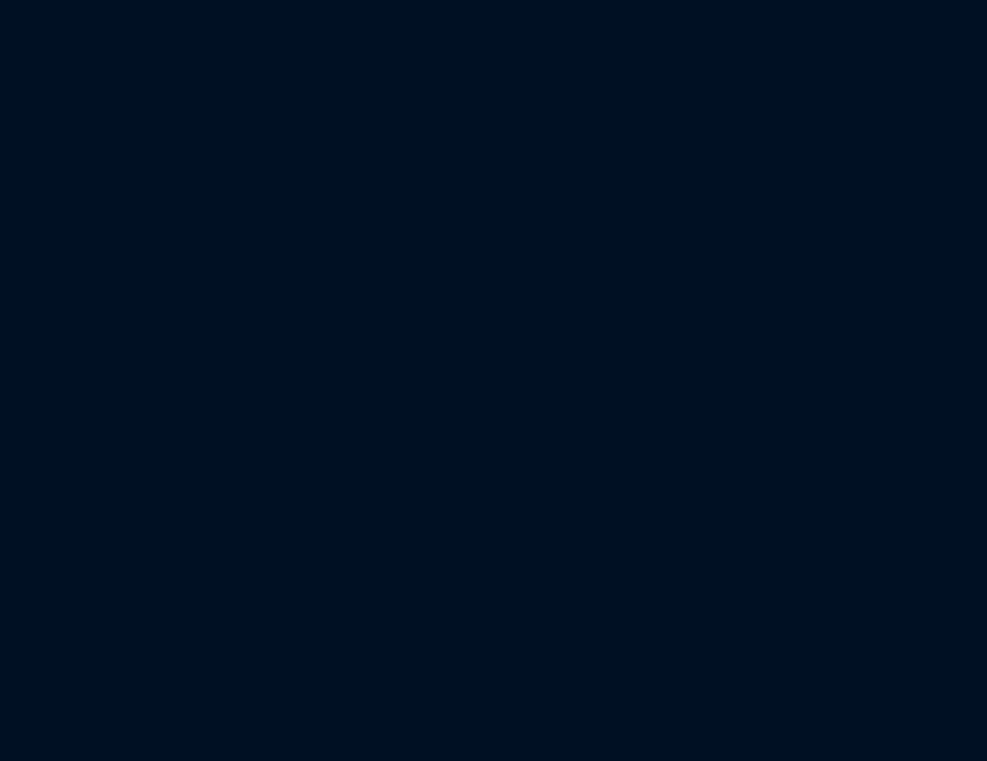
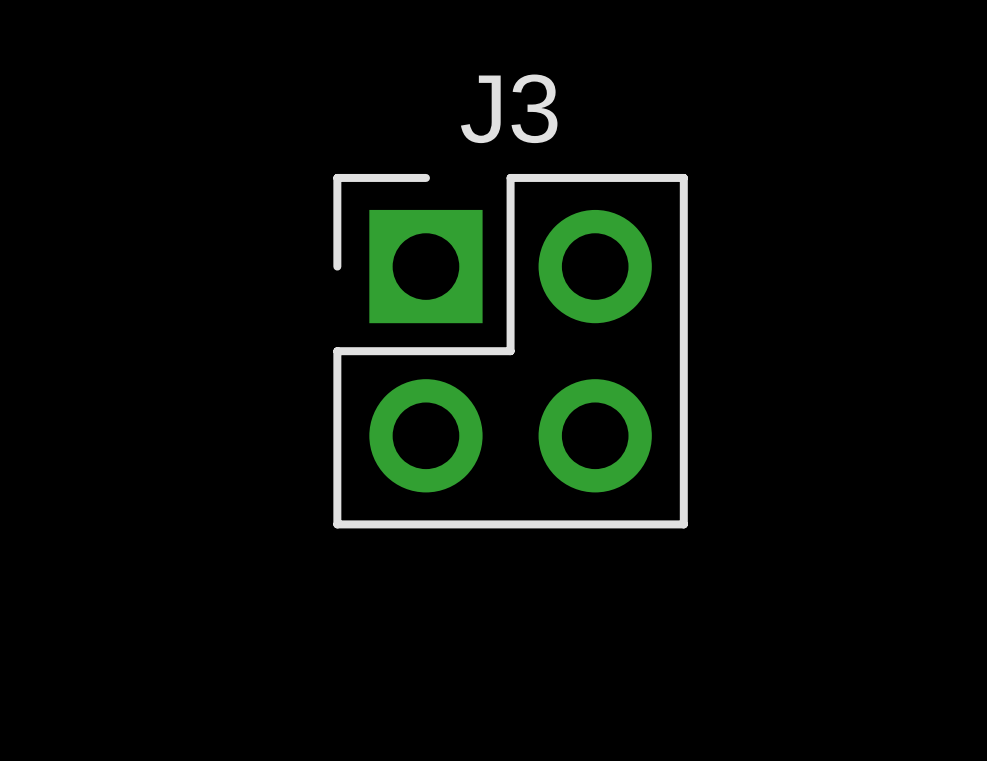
J3: none -> (510, 351)

